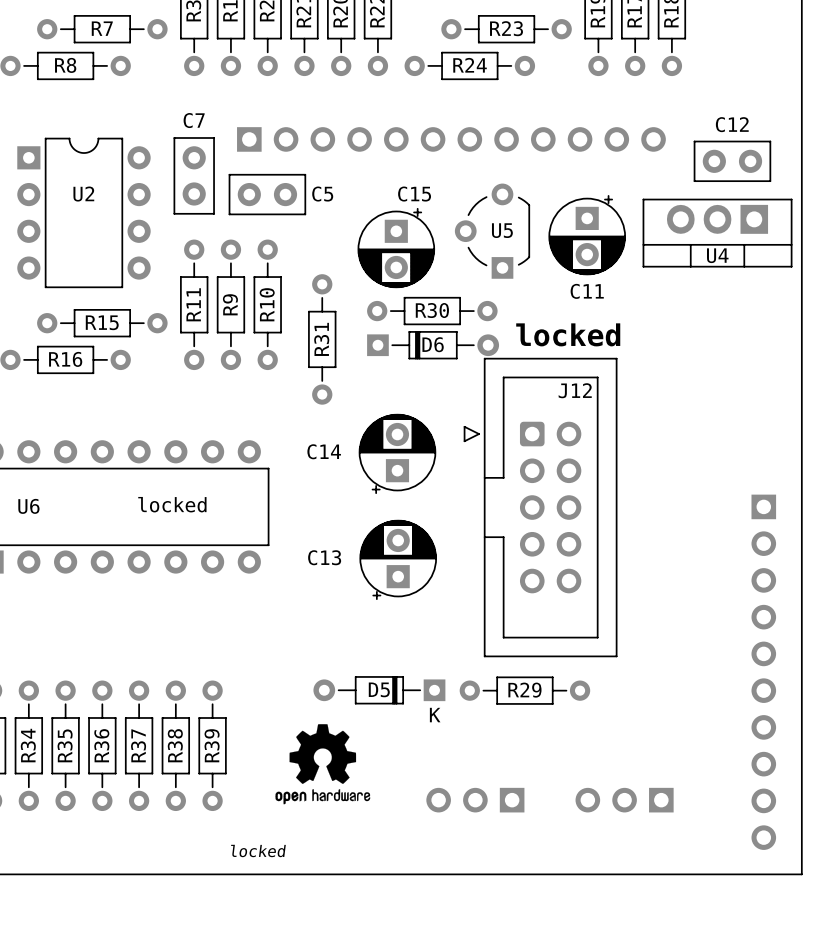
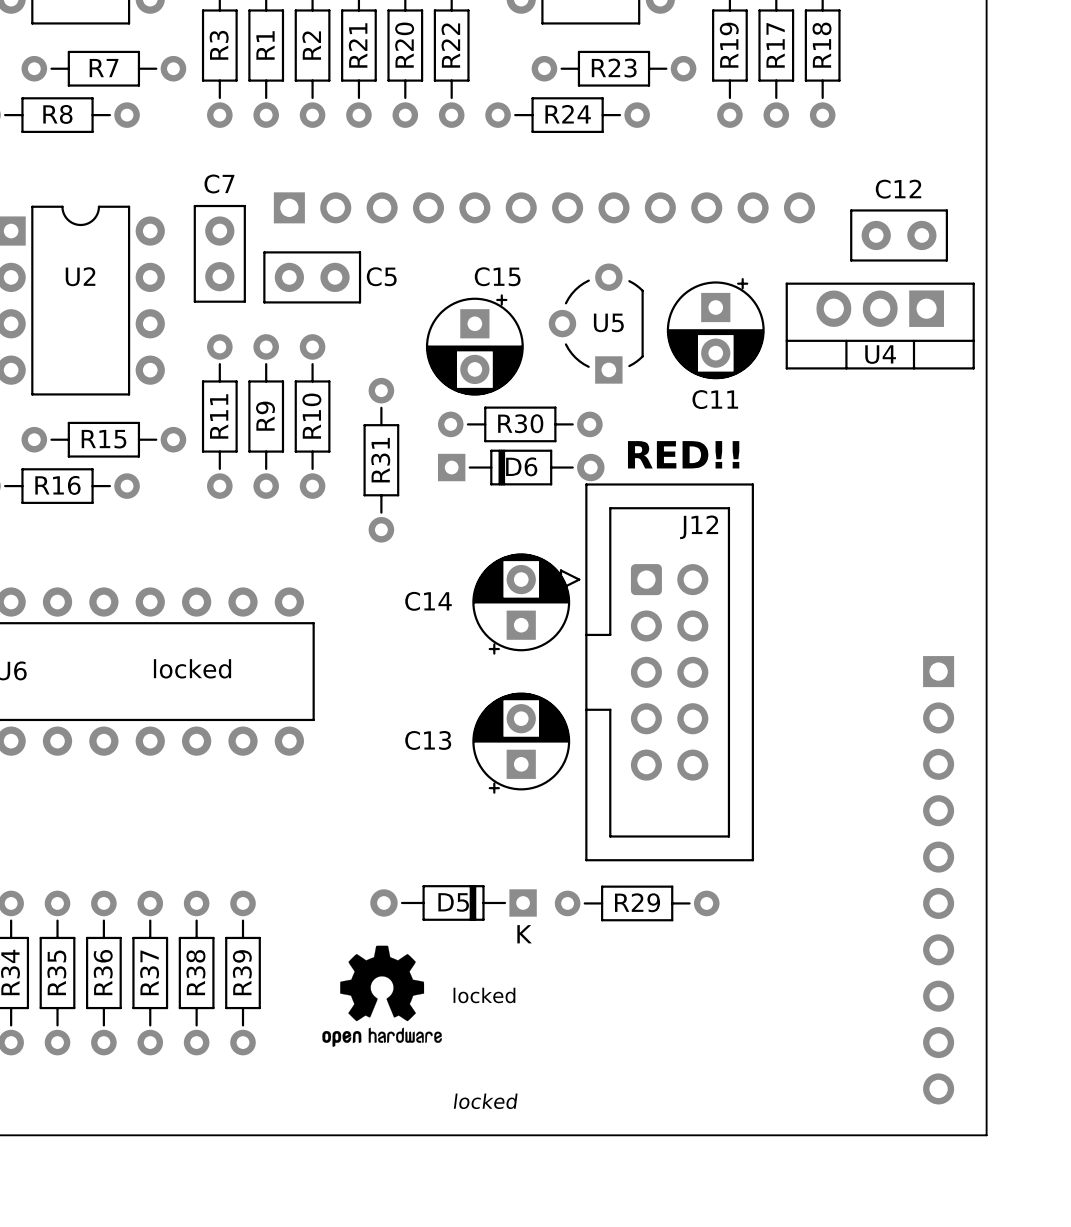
text: locked (568, 334) -> RED!! (683, 454)
C14 position: (397, 453) -> (521, 604)
C13 position: (398, 559) -> (521, 743)
text: none -> locked (484, 995)
part: (475, 800) -> none
part: (624, 800) -> none
text: none -> locked (485, 1101)
text: locked (258, 850) -> none

